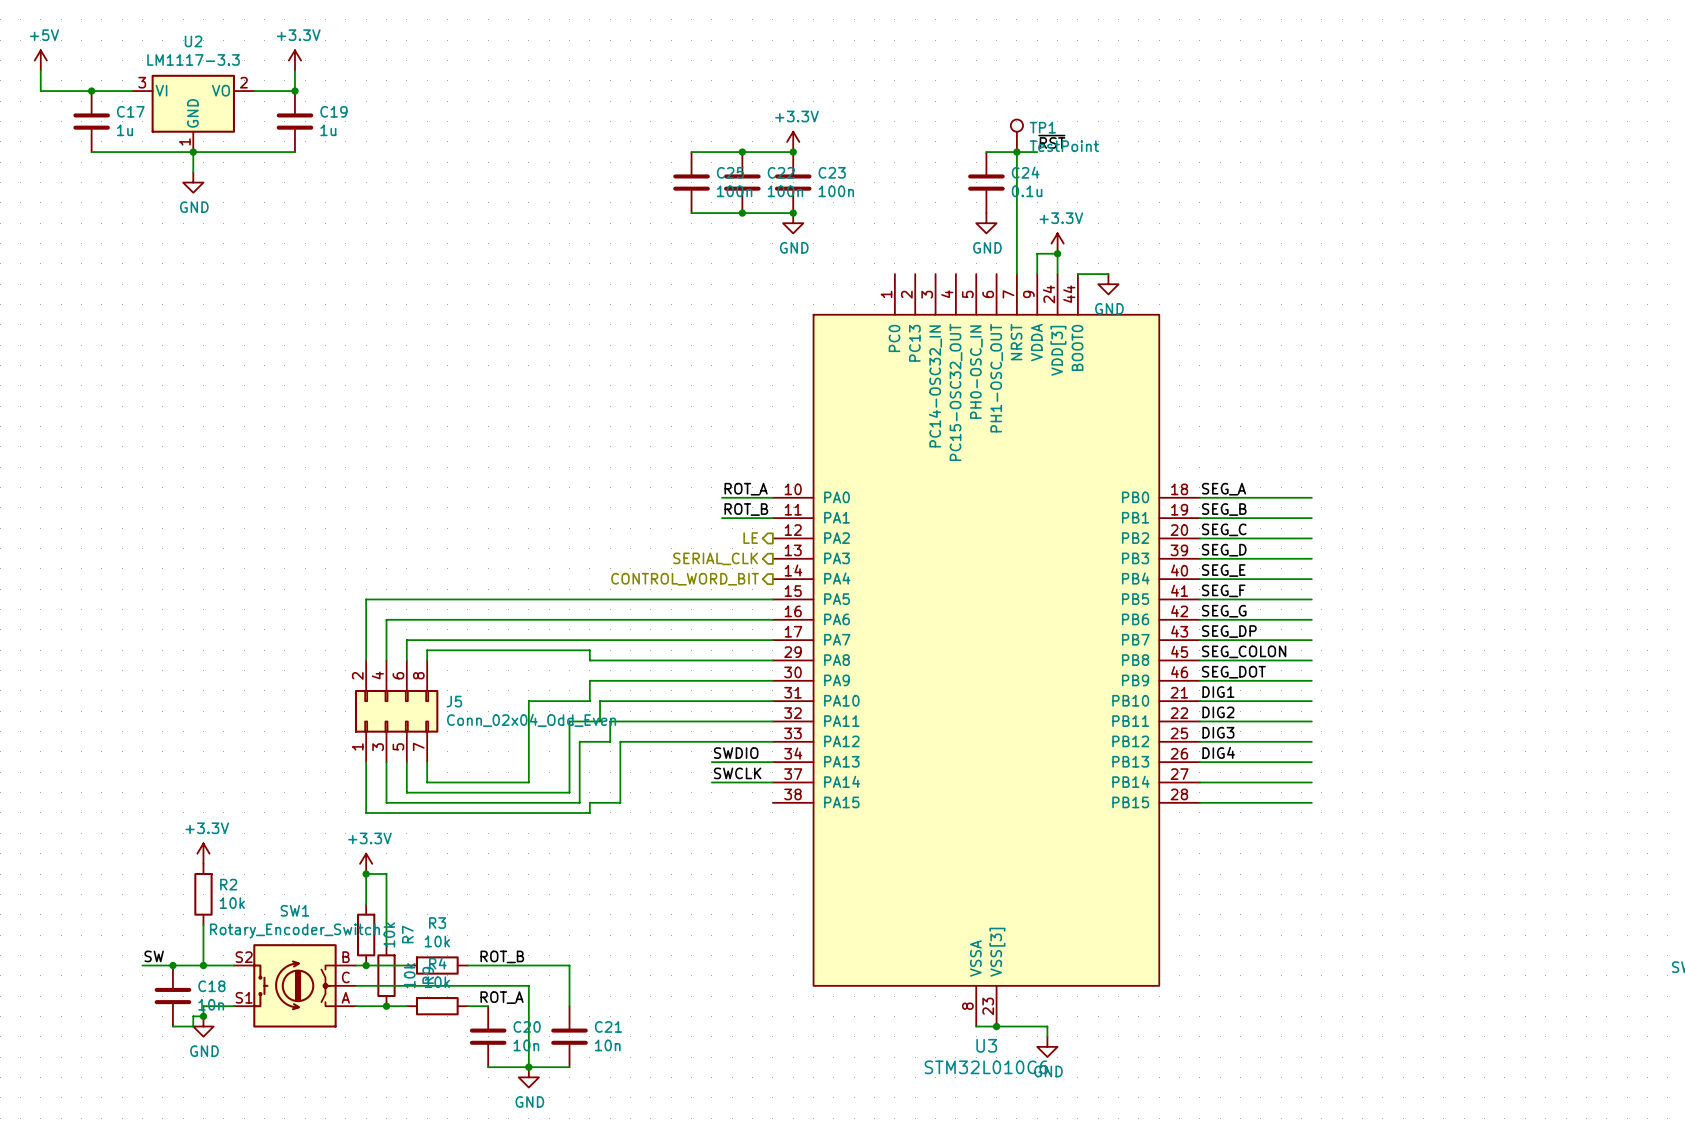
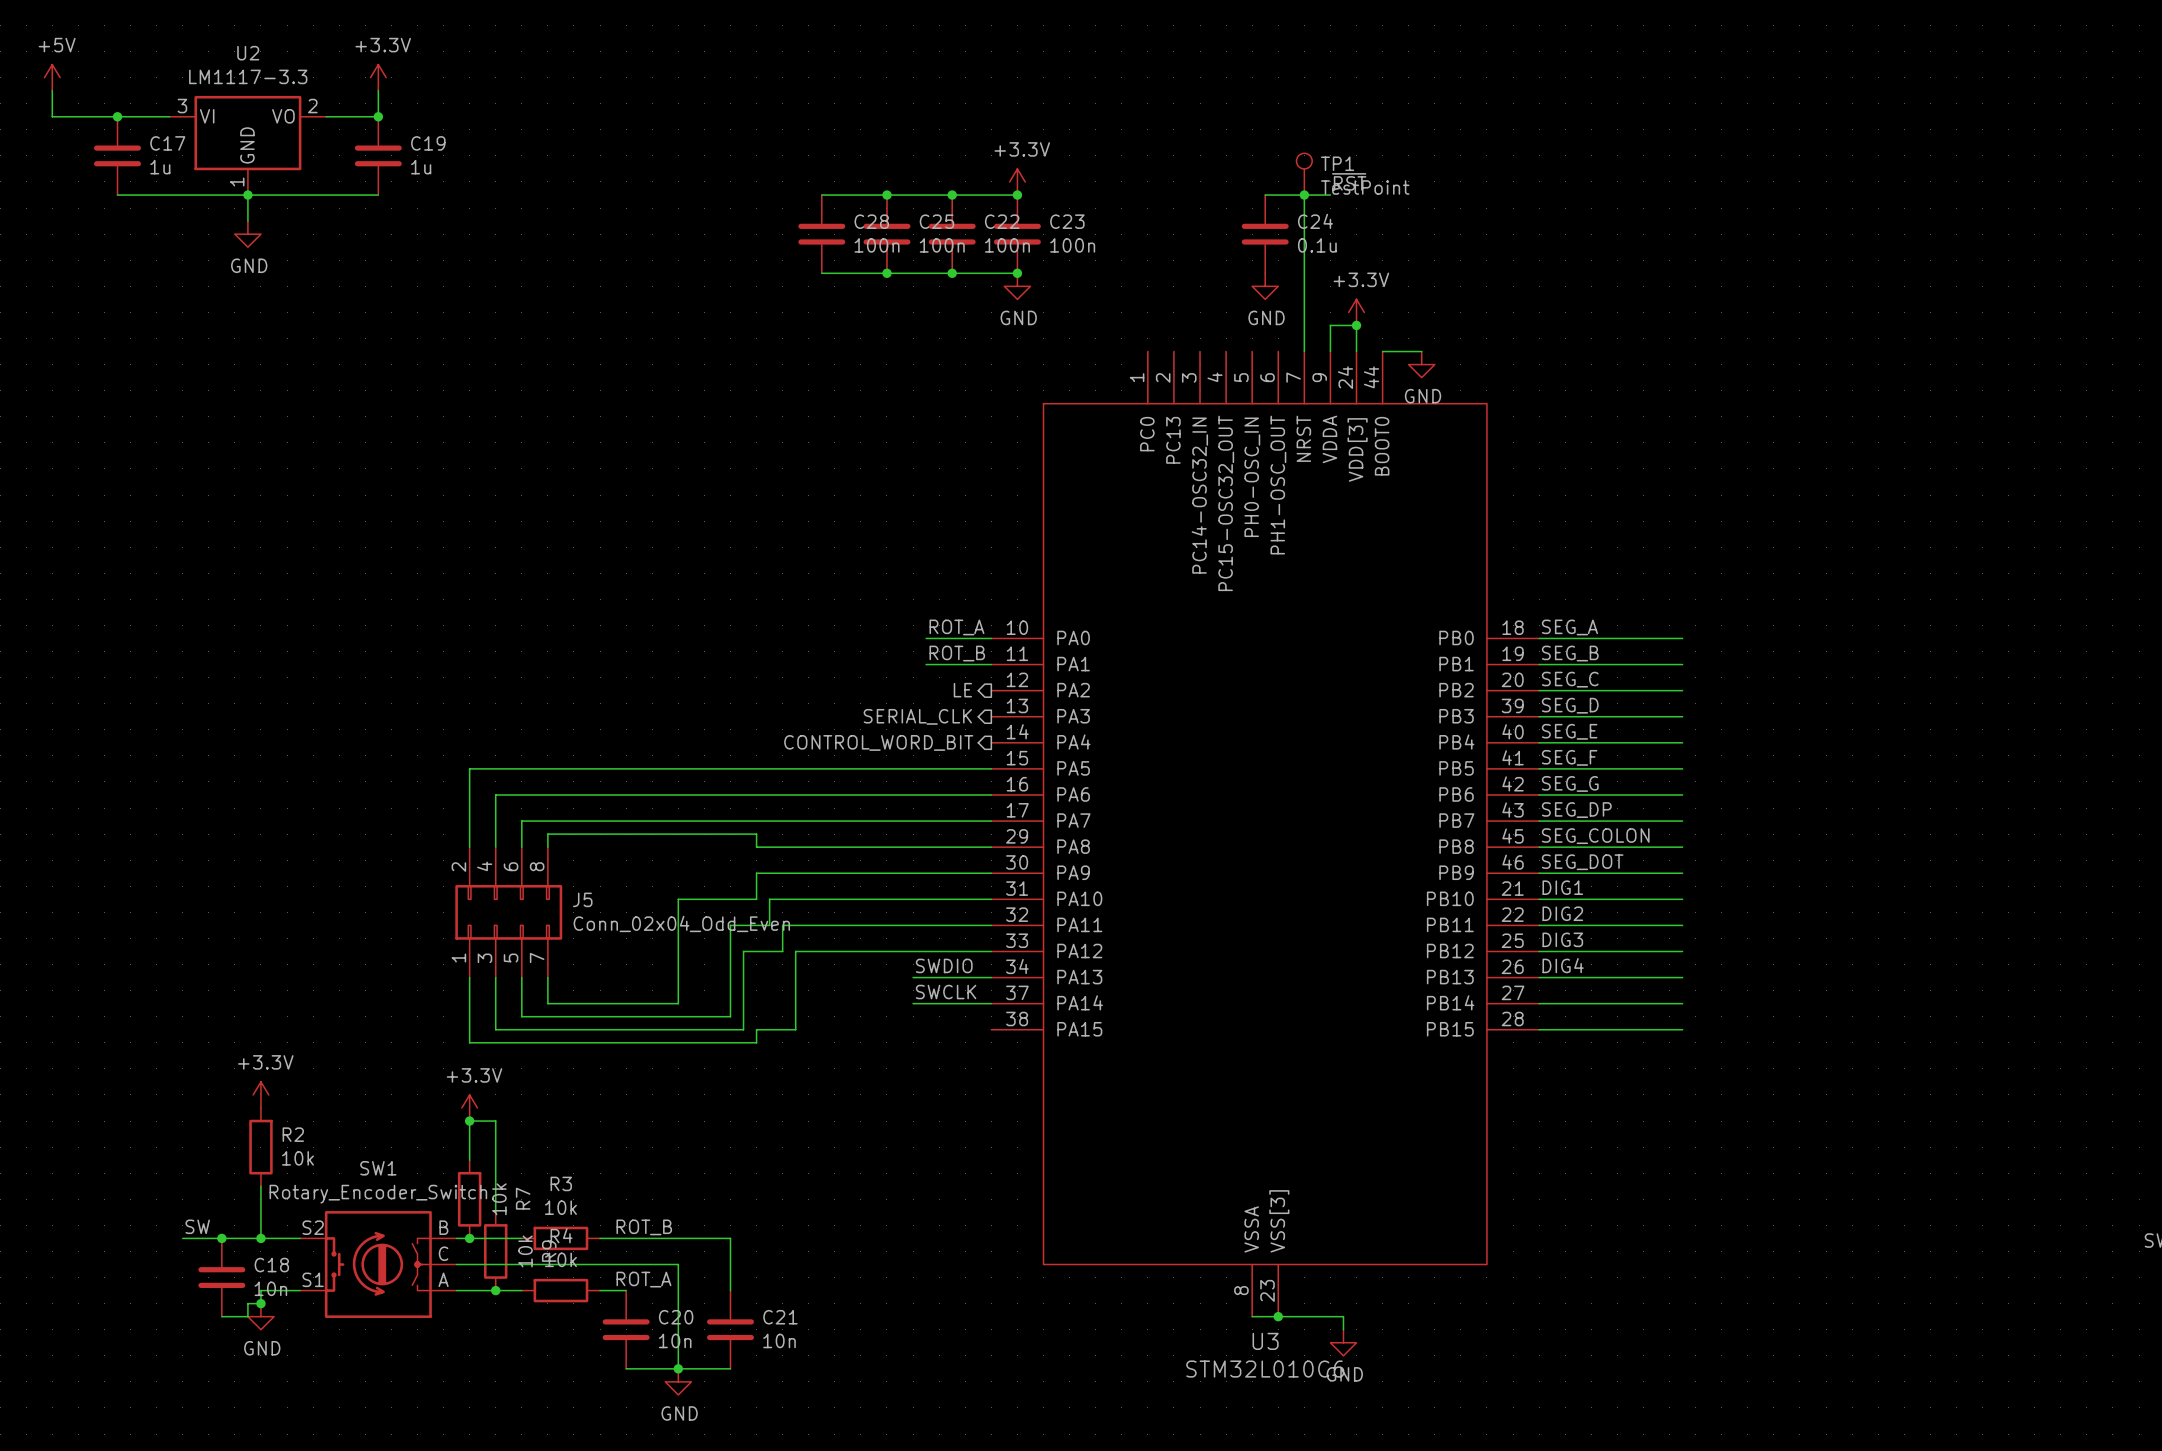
wire: none -> (821, 195) (886, 195)
junction: none -> (886, 195)
C28: none -> 100n (821, 234)
wire: none -> (821, 273) (886, 273)
junction: none -> (886, 273)

